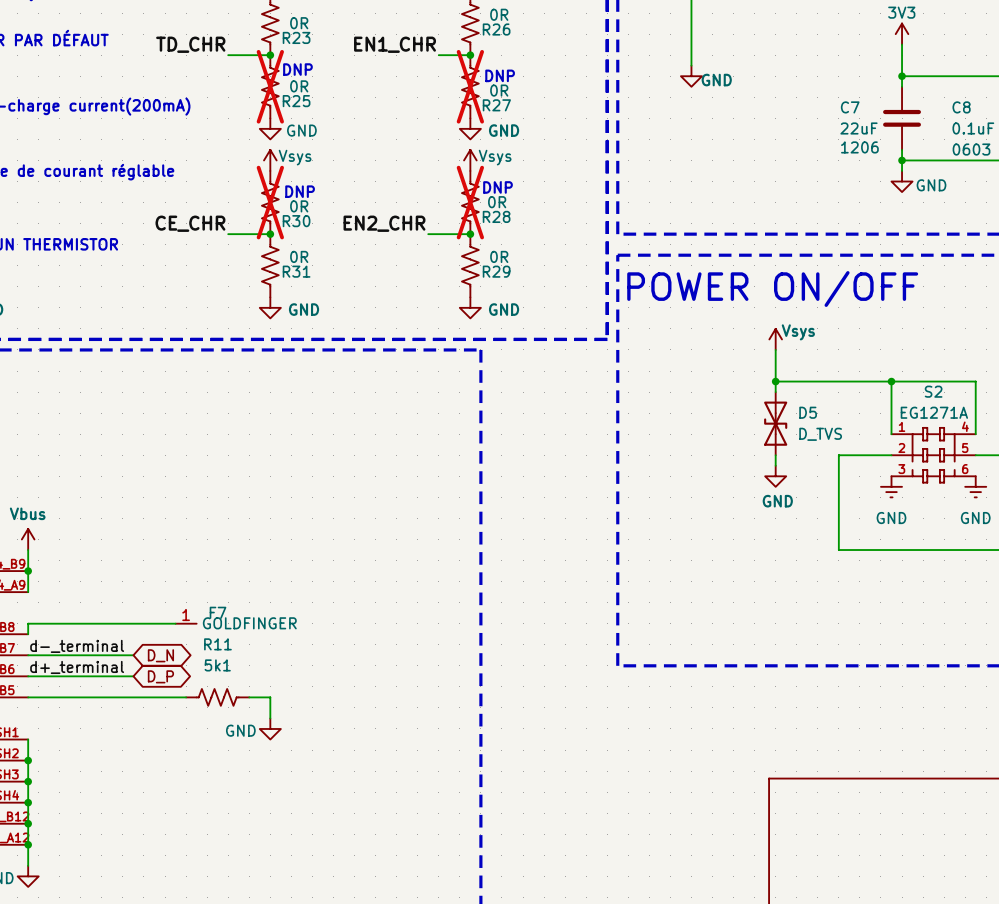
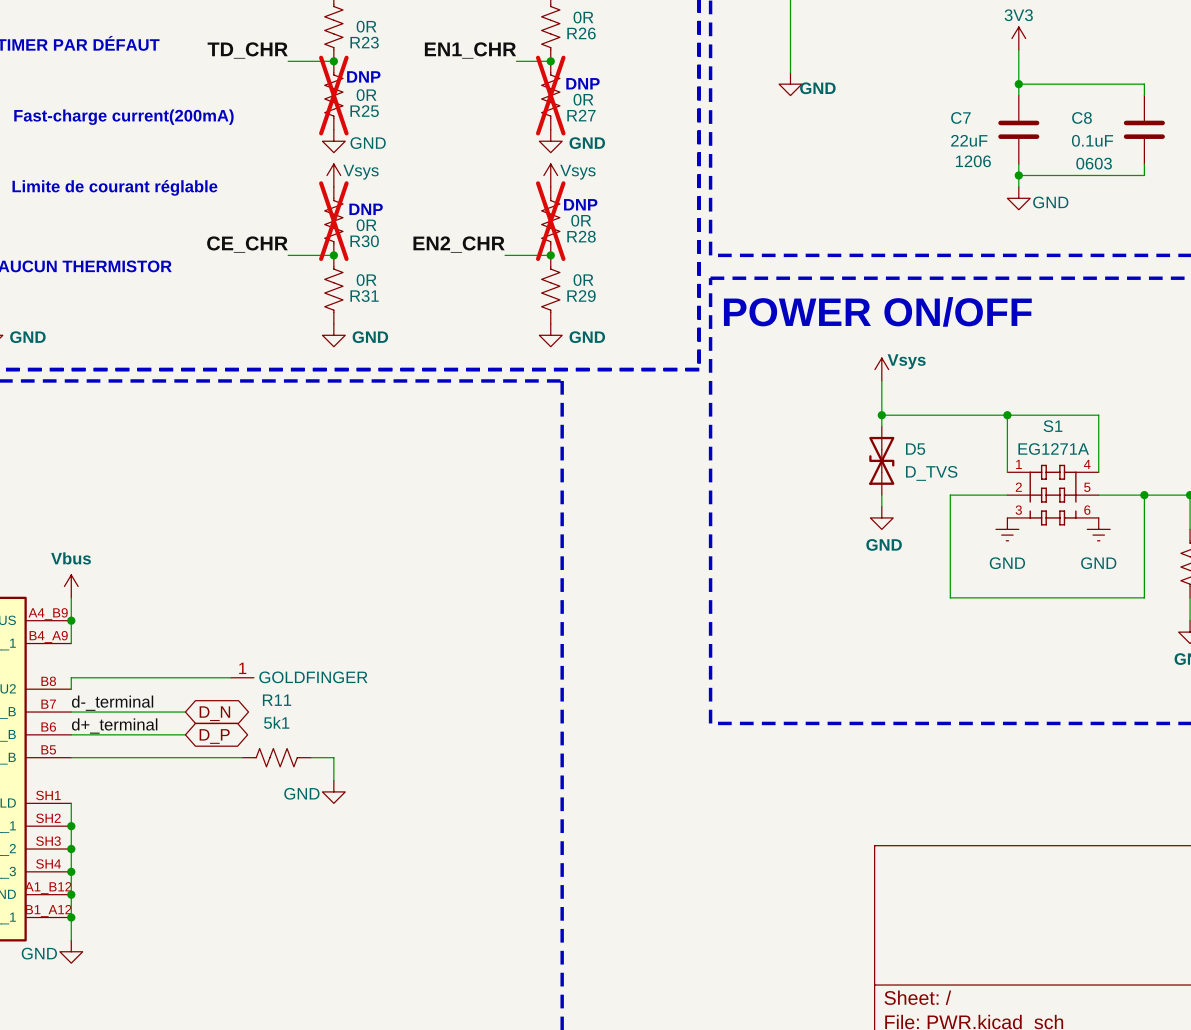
S2 name: S2 (933, 391) -> S1 (1053, 426)
F7 name: F7 (218, 612) -> none

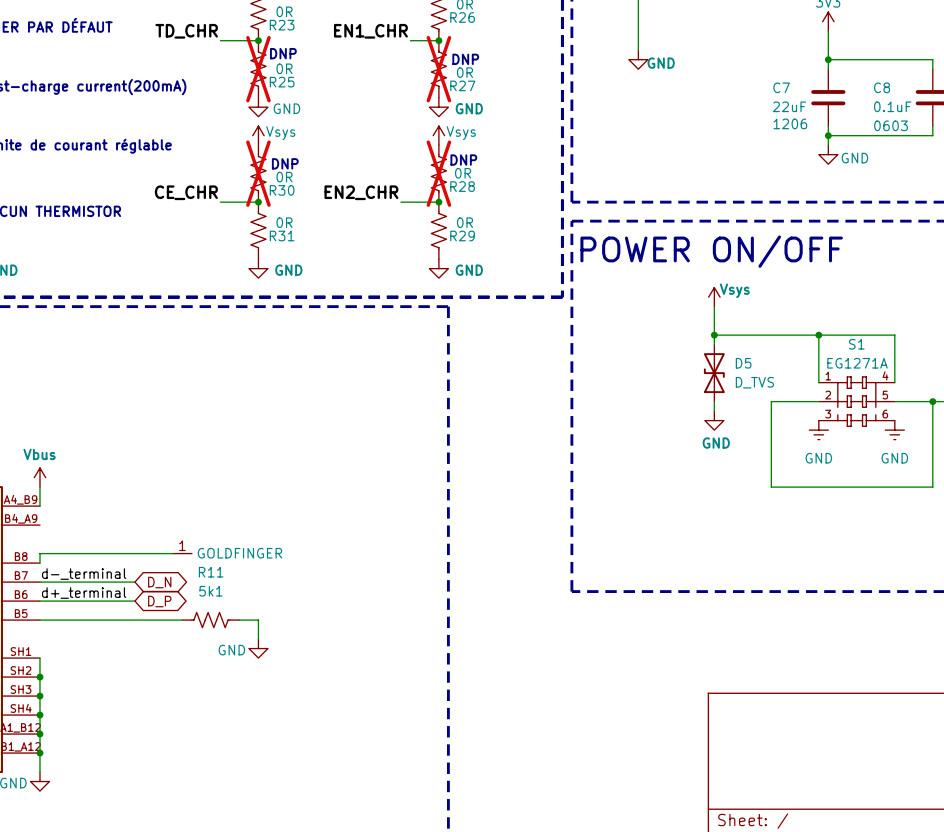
wire: (71, 620) (71, 643) -> none
junction: (71, 620) -> none

